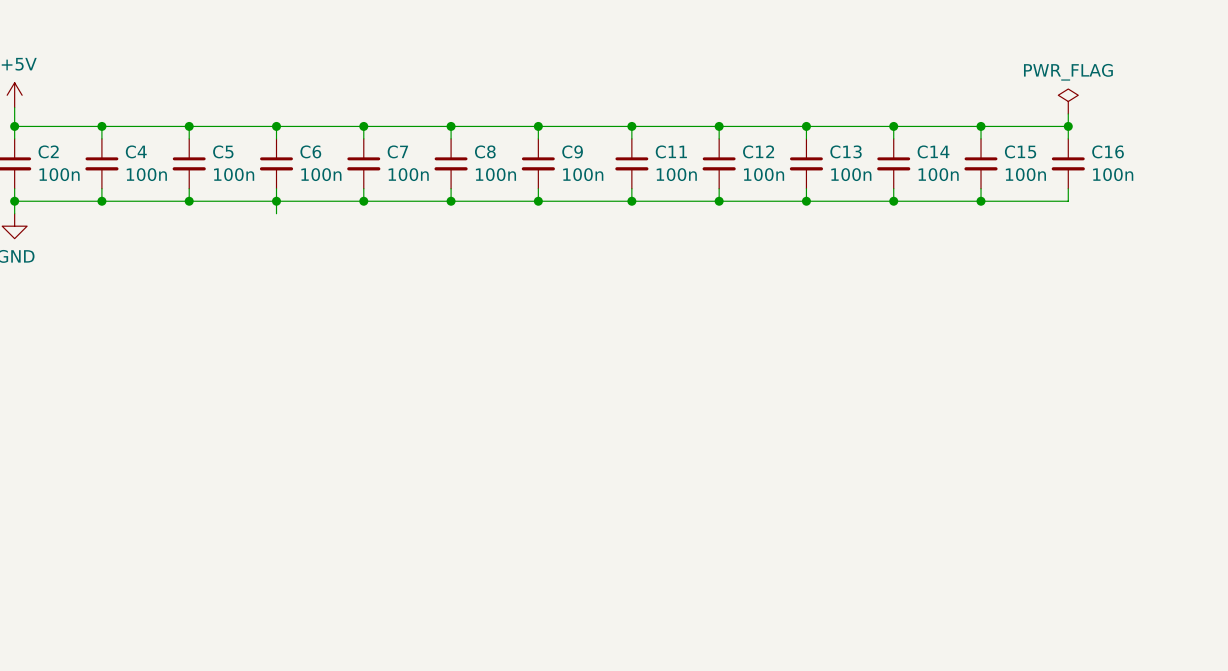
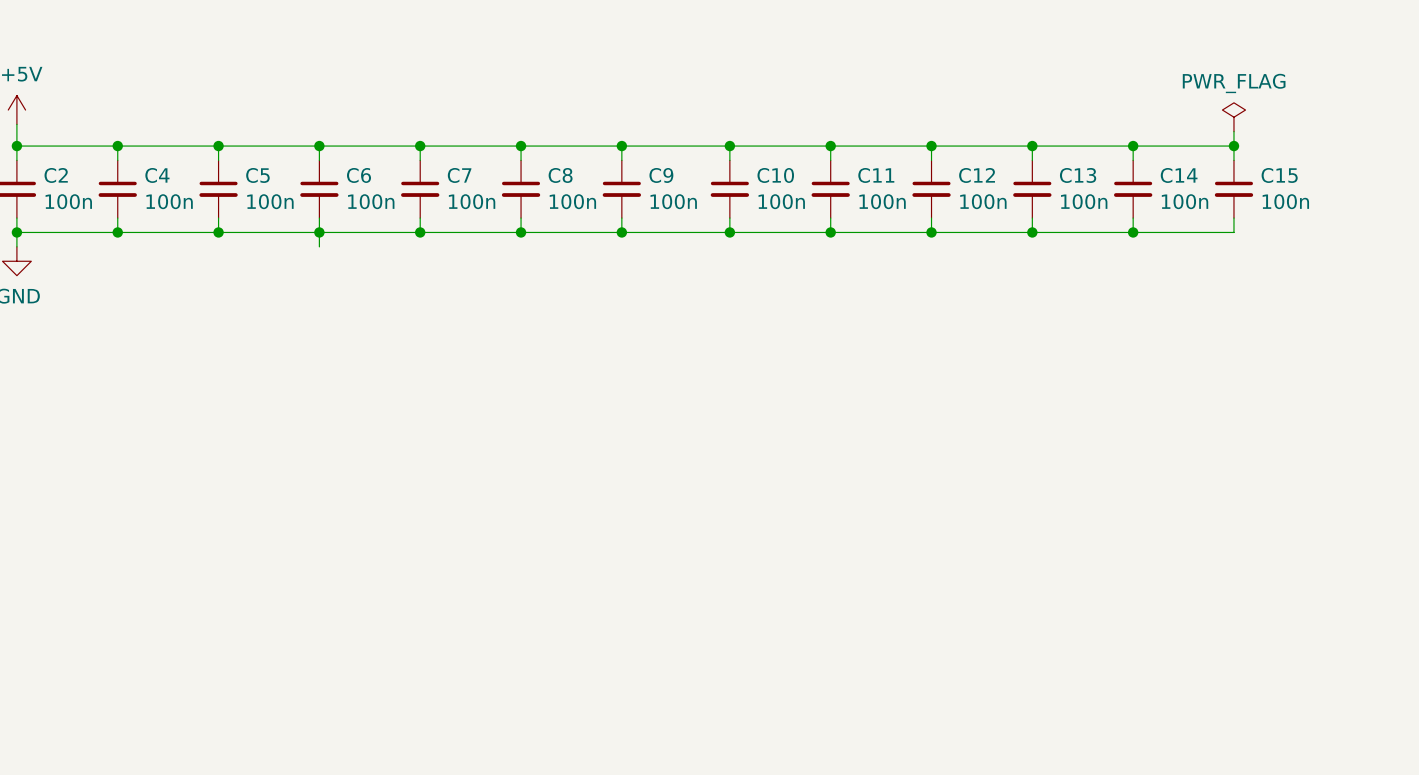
C11 name: C11 (671, 151) -> C10 (775, 175)
C12 name: C12 (758, 151) -> C11 (876, 175)
C13 name: C13 (846, 151) -> C12 (977, 175)
C14 name: C14 (933, 151) -> C13 (1078, 175)
C15 name: C15 (1020, 151) -> C14 (1179, 175)
C16 name: C16 (1108, 151) -> C15 (1279, 175)

